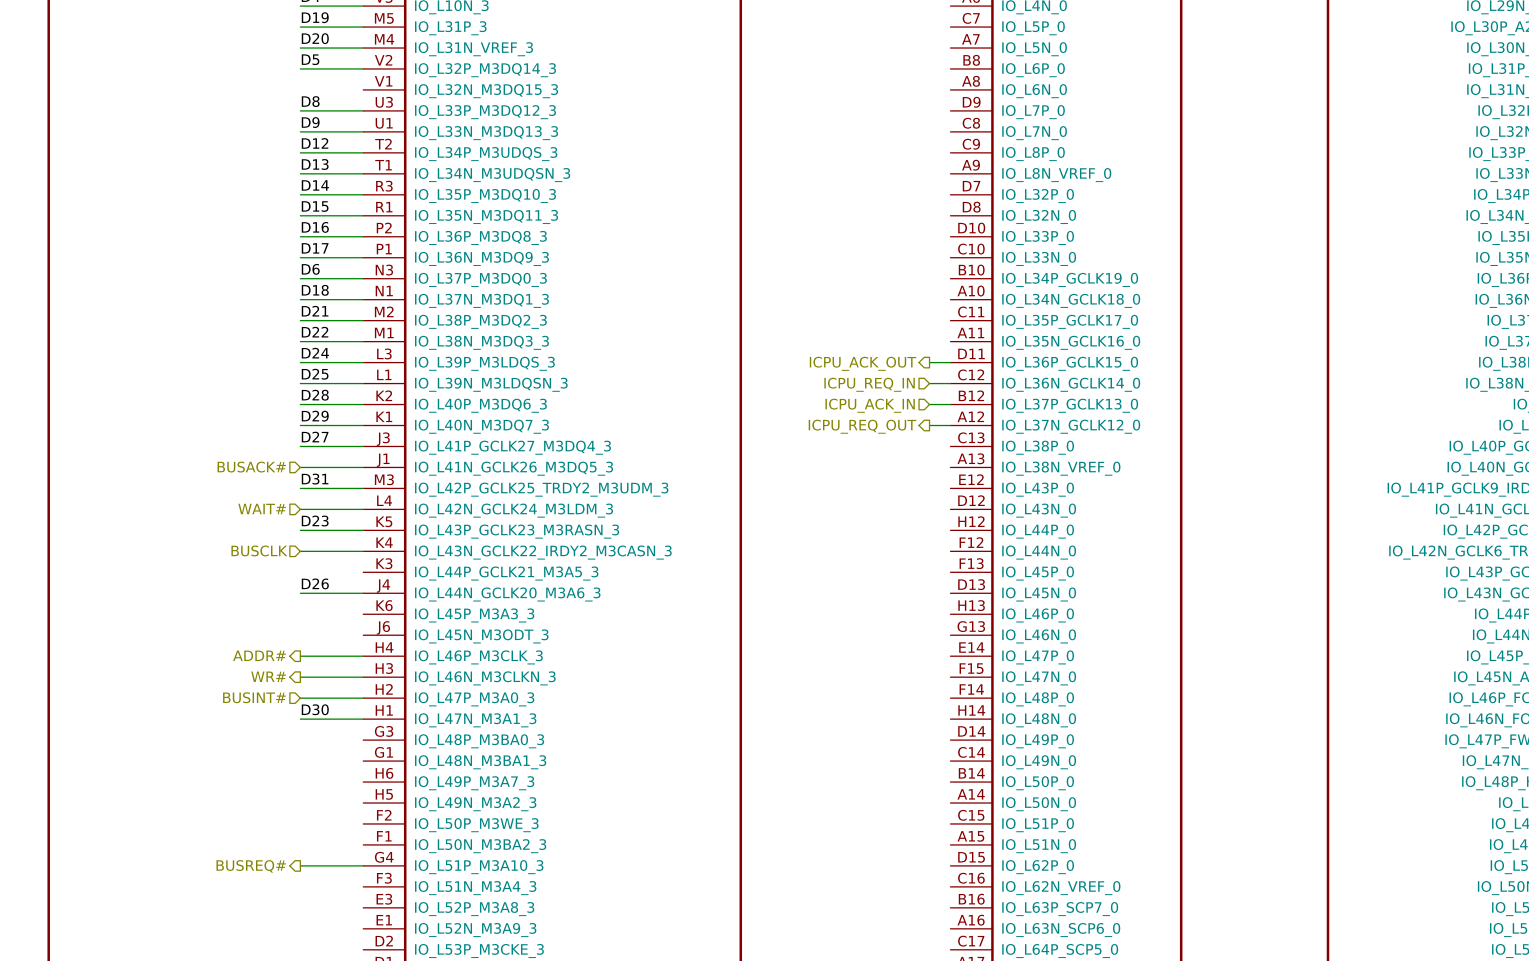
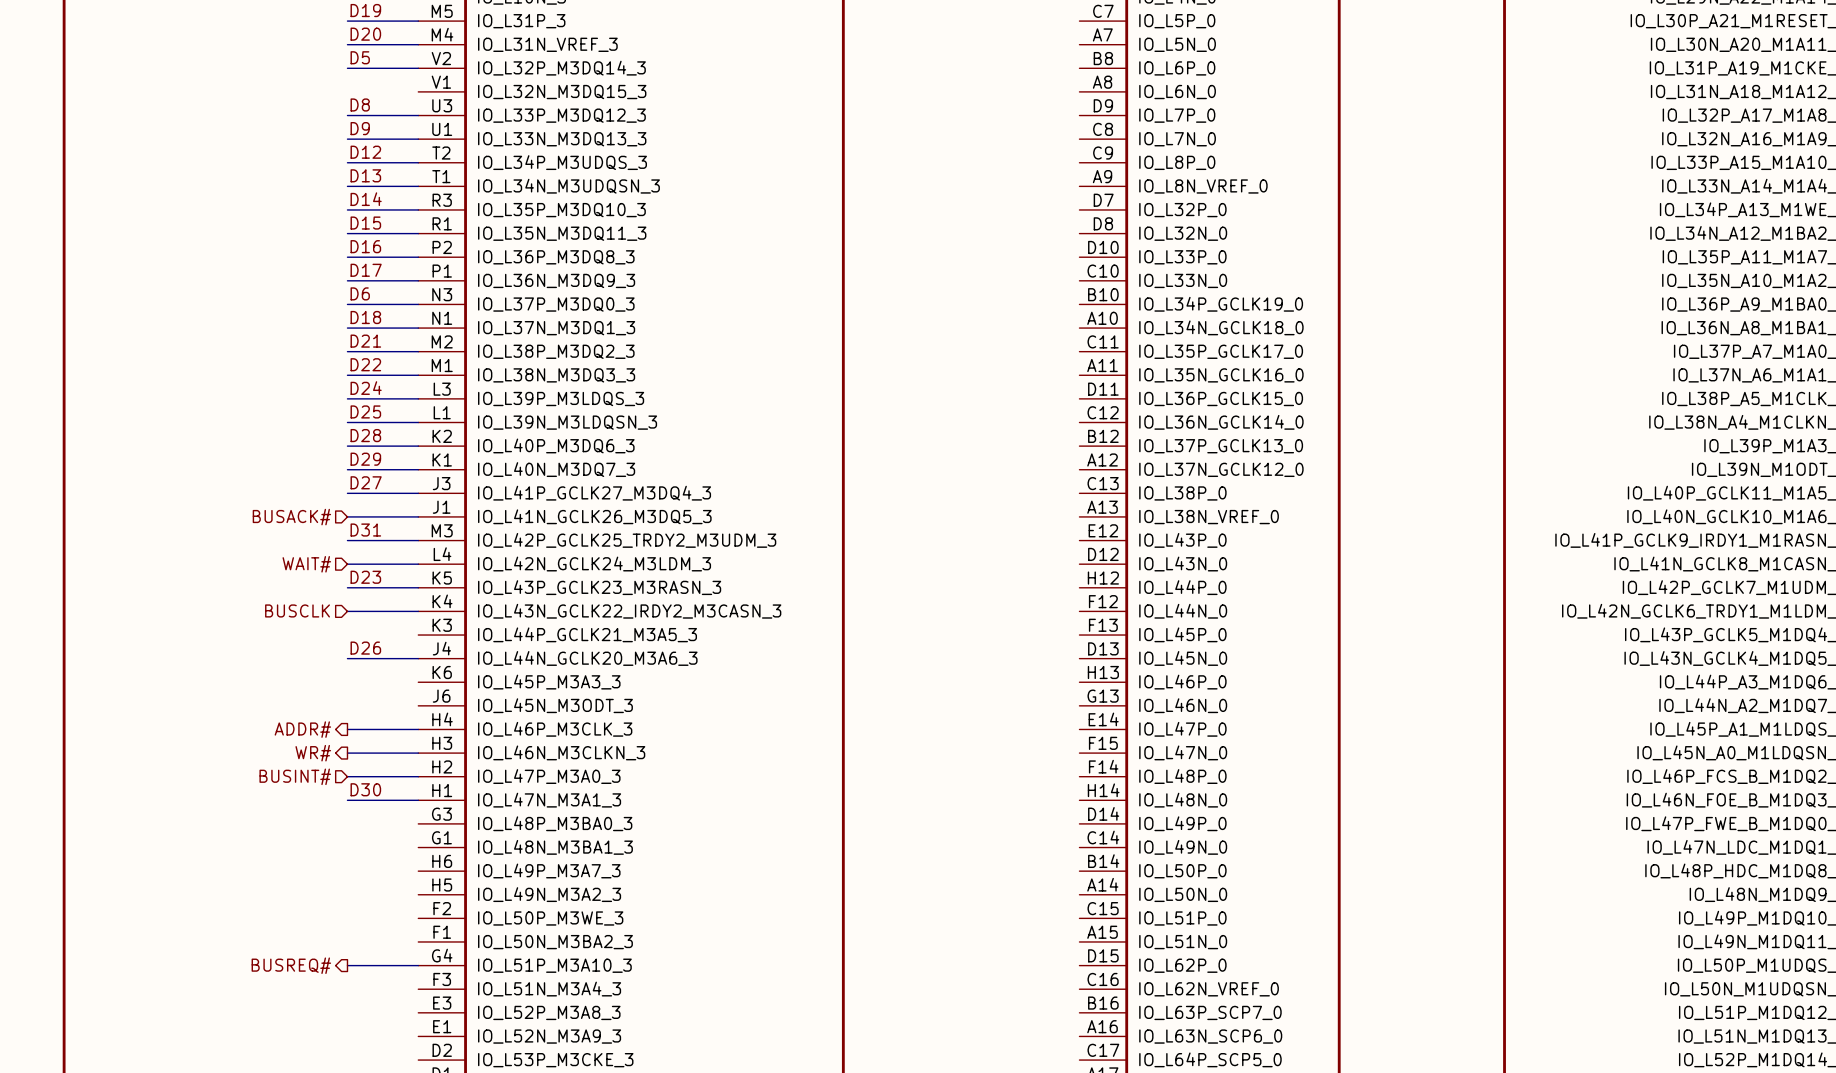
wire: (929, 362) (950, 362) -> none
hierarchical label: ICPU_ACK_OUT (863, 363) -> none
wire: (929, 383) (950, 383) -> none
hierarchical label: ICPU_REQ_IN (869, 384) -> none
wire: (929, 404) (950, 404) -> none
hierarchical label: ICPU_ACK_IN (870, 405) -> none
wire: (929, 425) (950, 425) -> none
hierarchical label: ICPU_REQ_OUT (862, 426) -> none

